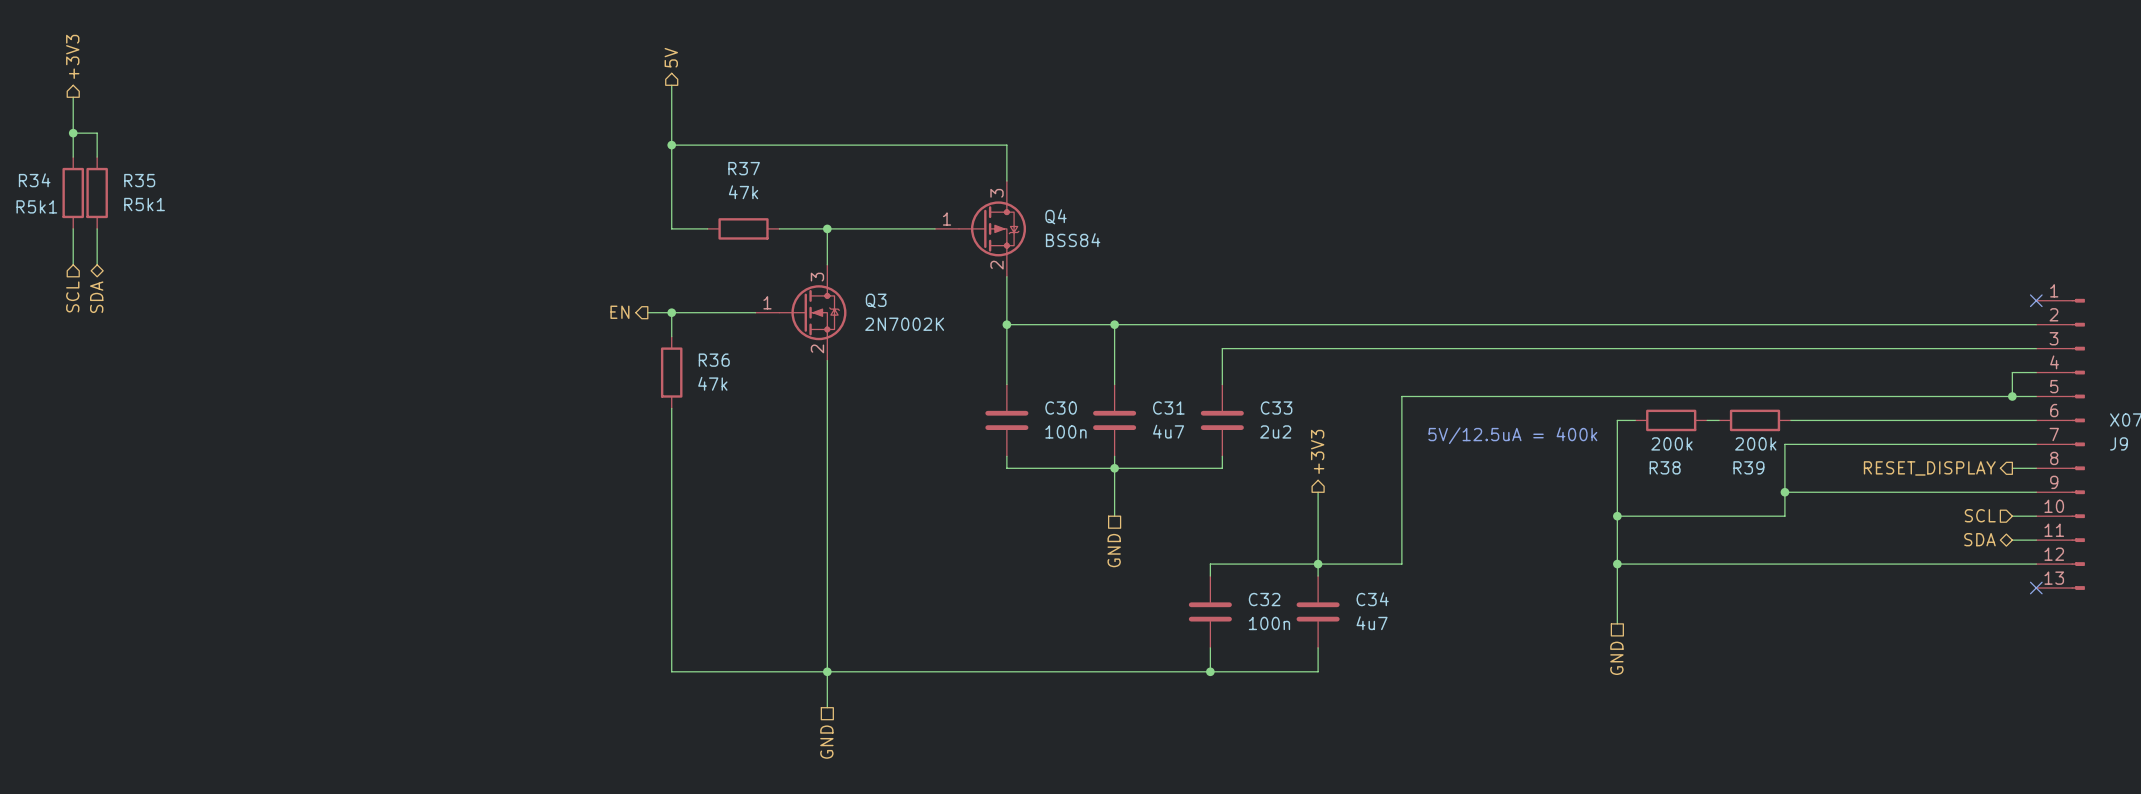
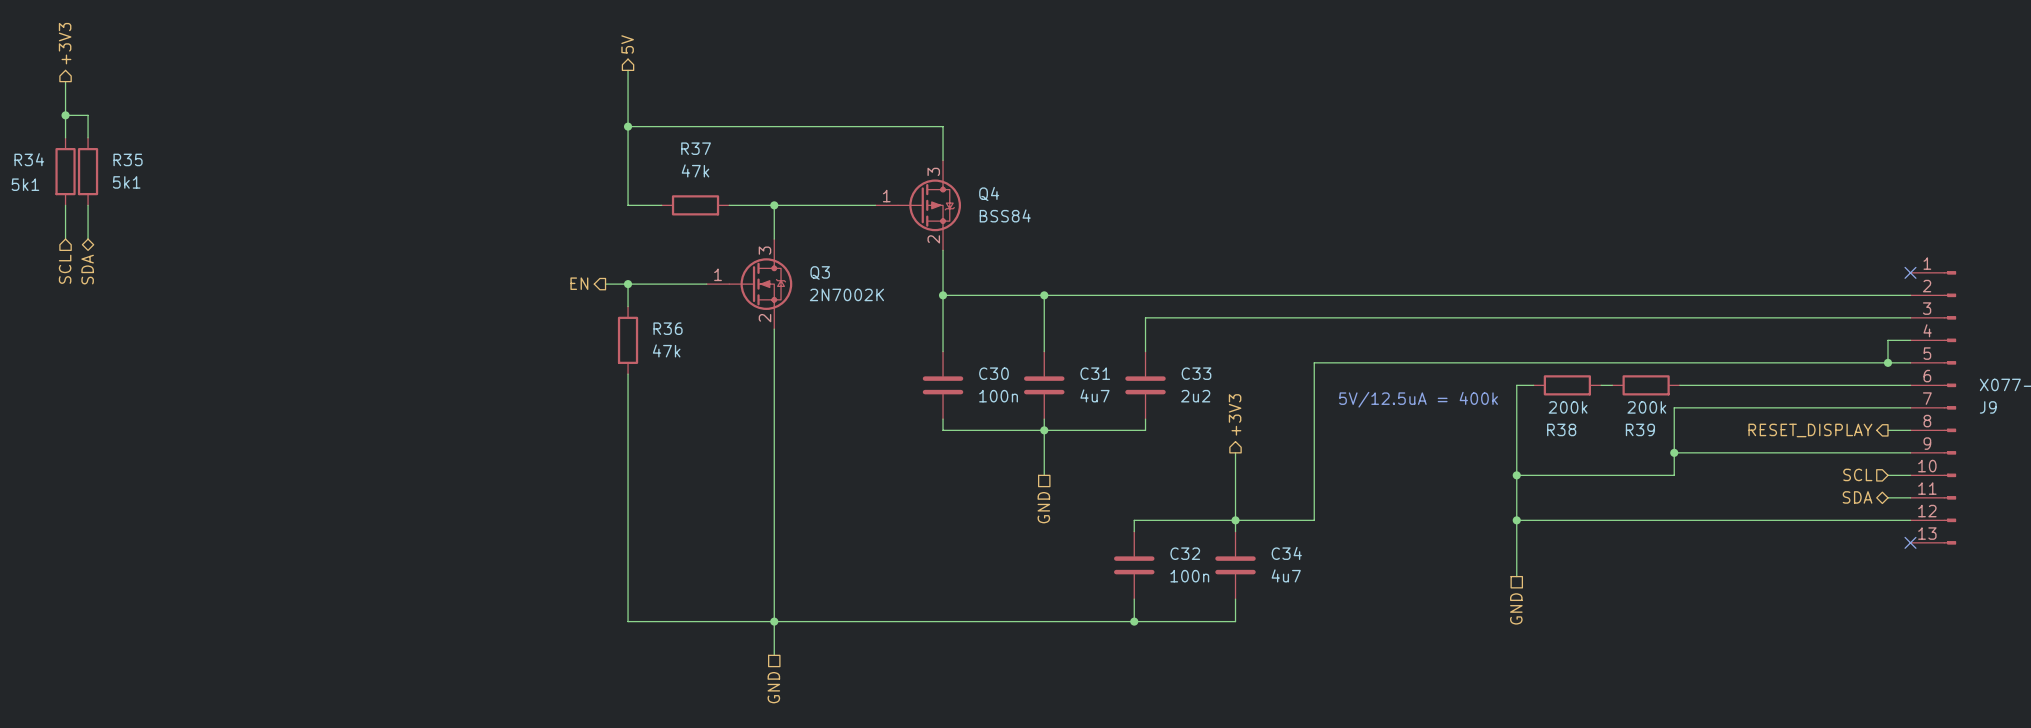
R35 value: R5k1 (144, 204) -> 5k1 (126, 182)
R34 value: R5k1 (36, 206) -> 5k1 (25, 184)

